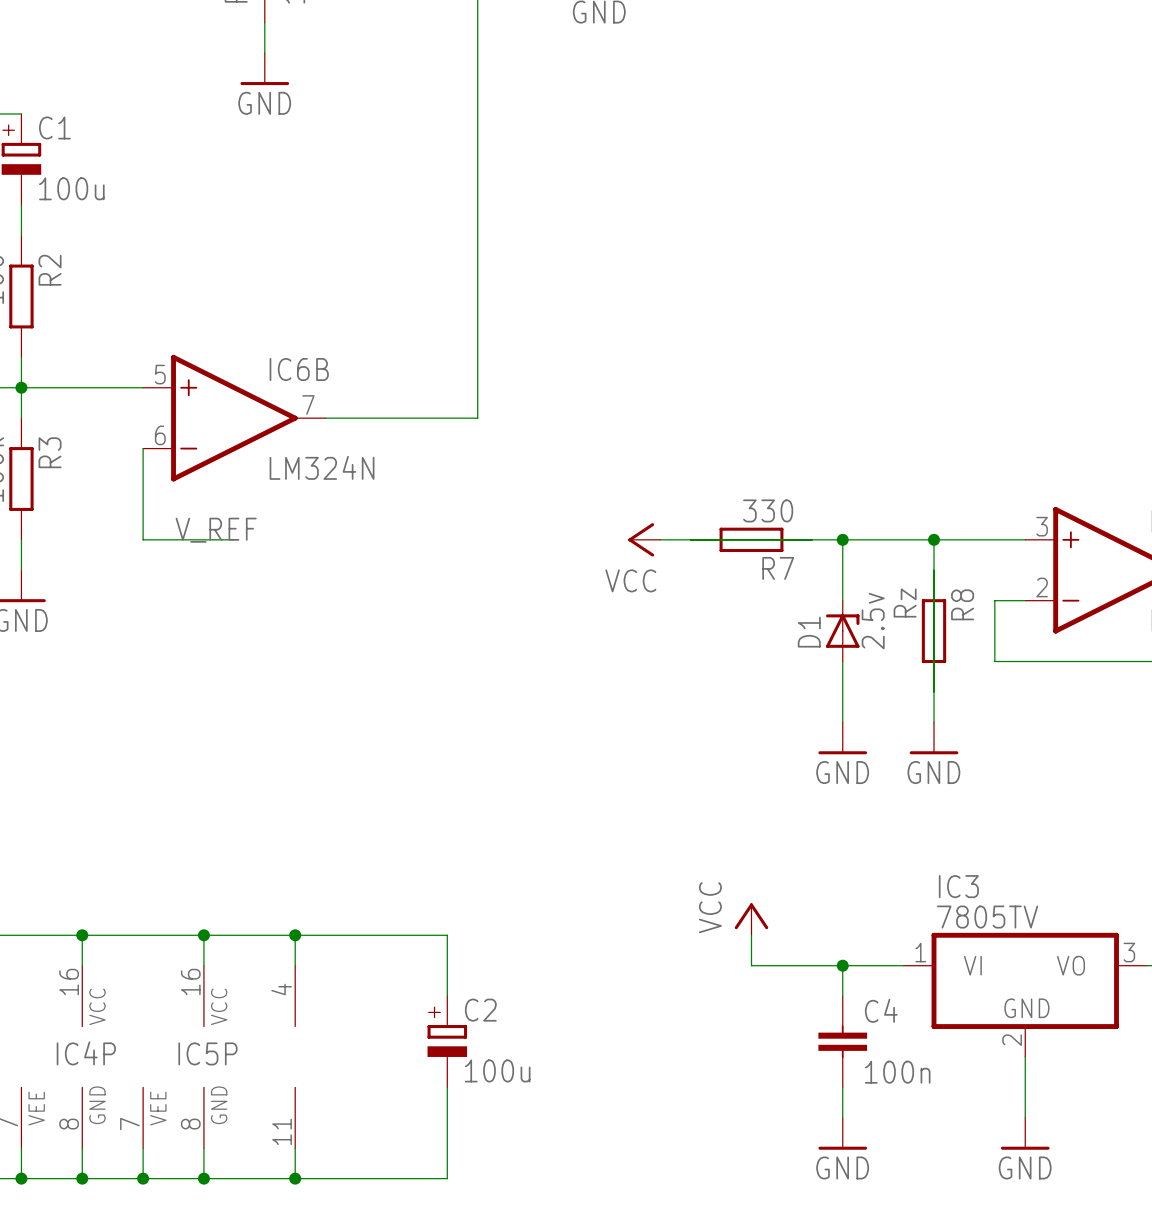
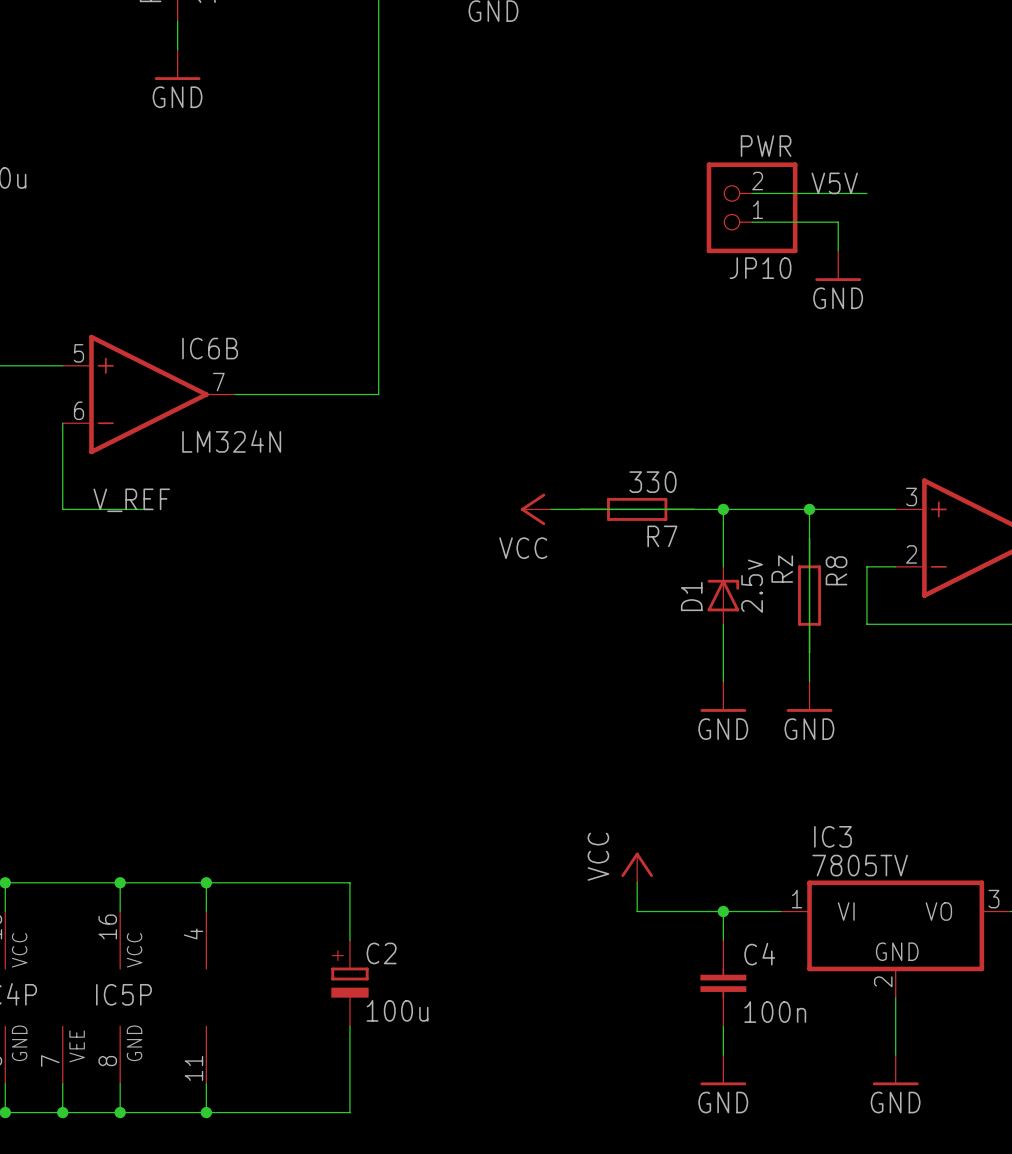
label: none -> V5V (834, 183)
wire: none -> (752, 193) (866, 193)
JP10: none -> PWR (752, 207)
wire: none -> (752, 222) (838, 222) (838, 250)
power symbol: none -> GND (838, 265)

